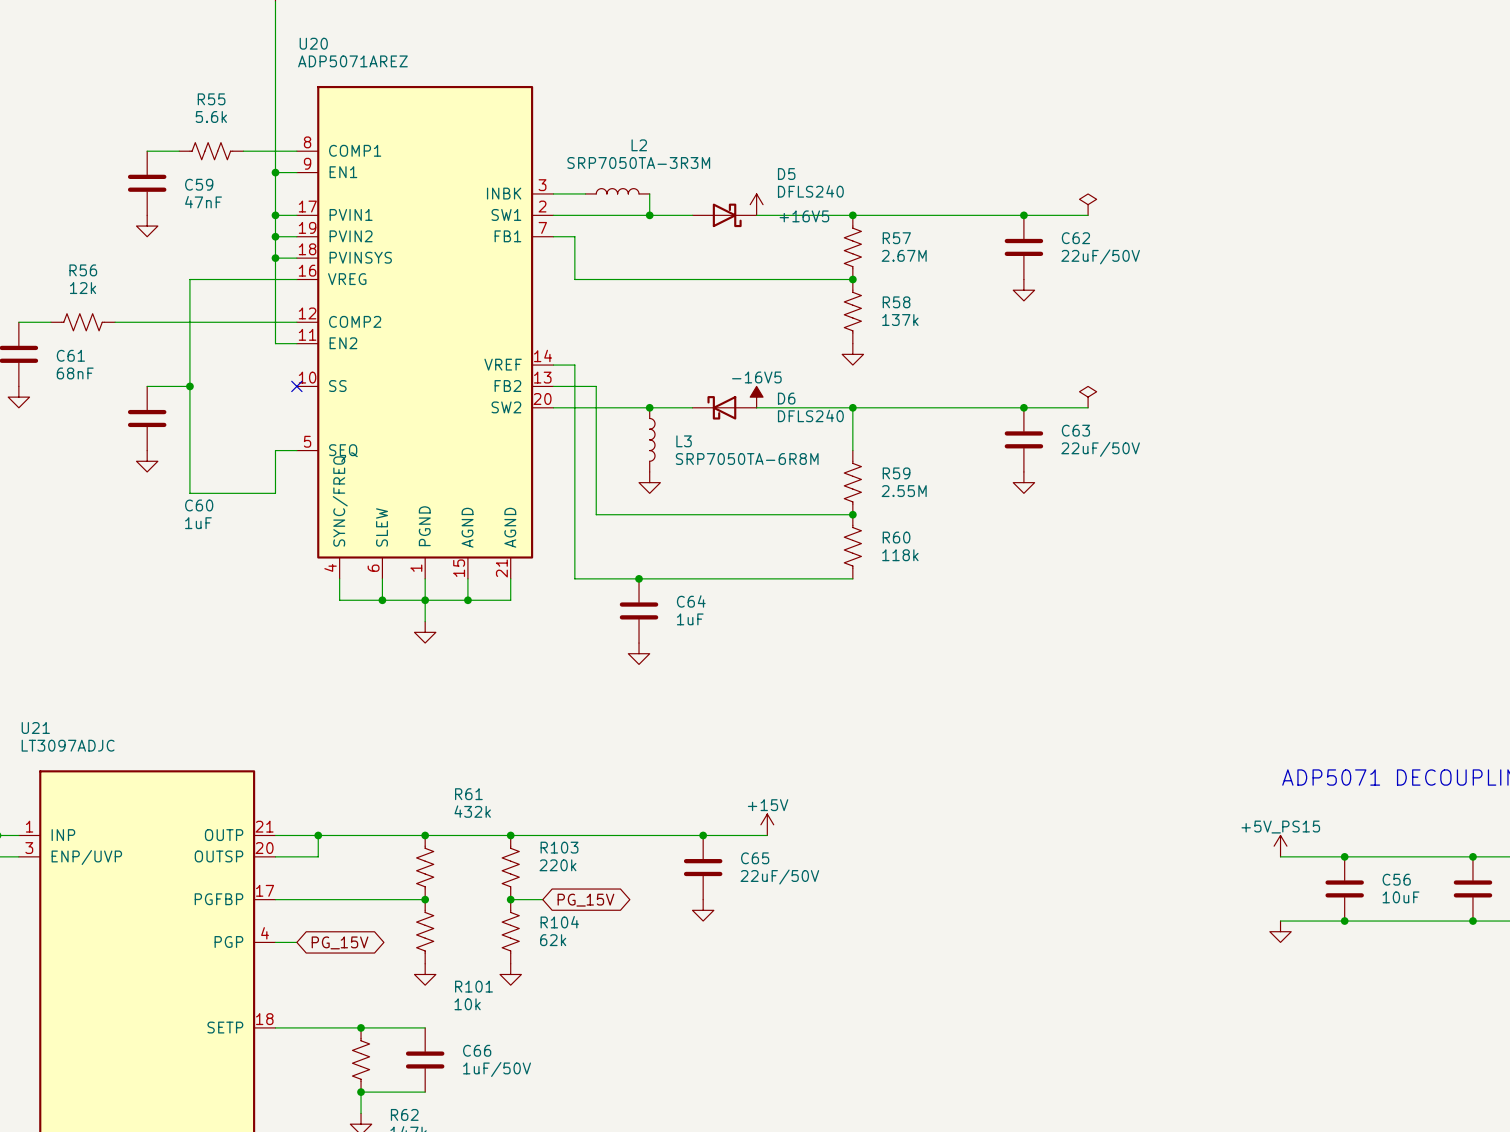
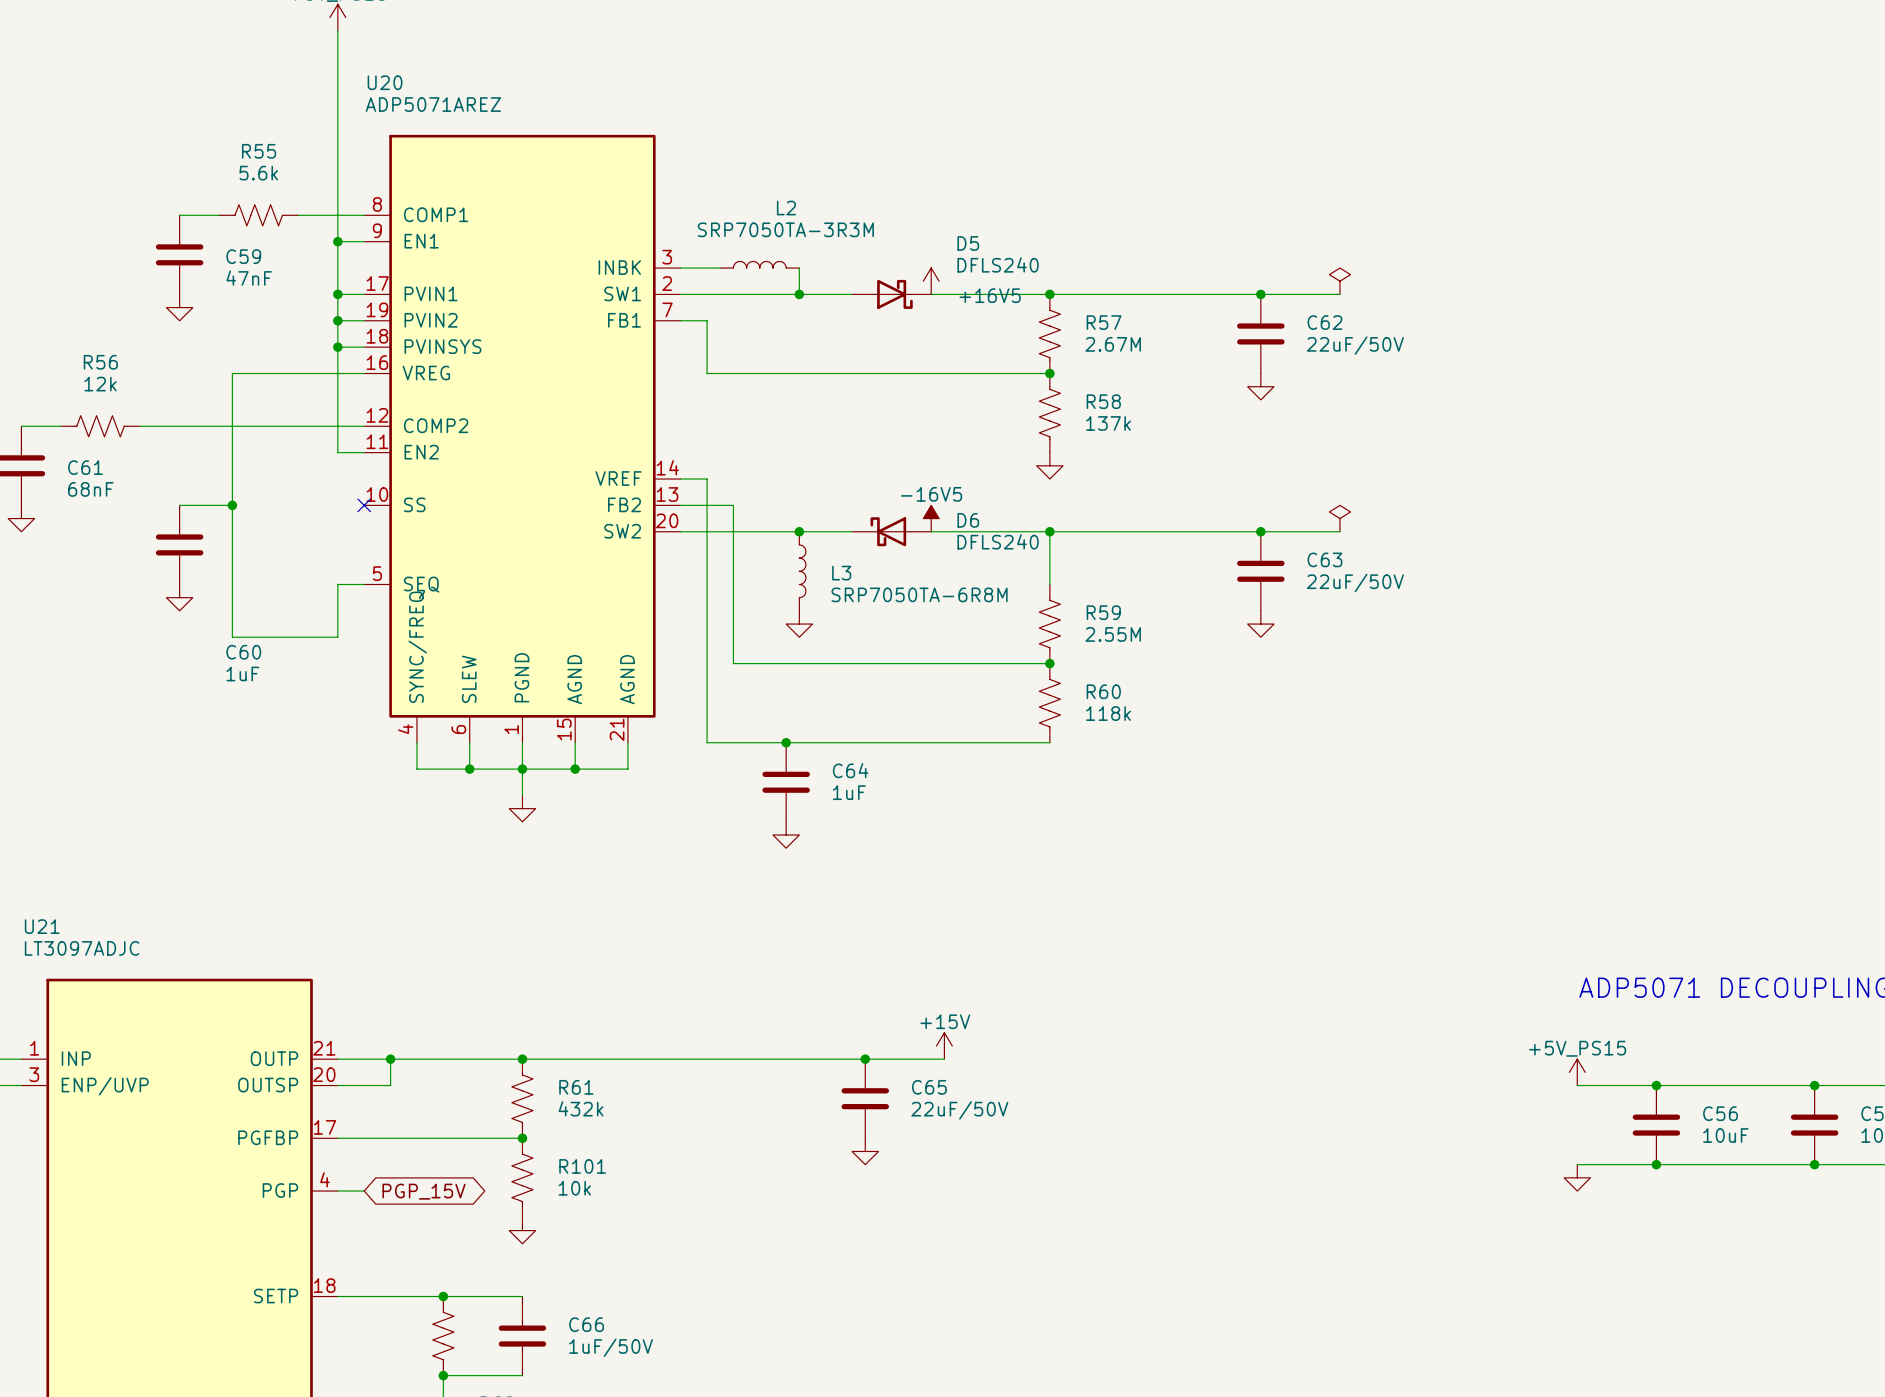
R61 name position: R61 (468, 794) -> R61 (576, 1087)
R61 value position: 432k (472, 811) -> 432k (581, 1108)
junction: (510, 835) -> none
R103: 220k (510, 867) -> none
wire: (510, 899) (542, 899) -> none
junction: (510, 899) -> none
global label: PG_15V (585, 900) -> none
R104: 62k (510, 931) -> none
global label: PG_15V (340, 942) -> PGP_15V (424, 1191)
power symbol: (510, 974) -> none
R101 name position: R101 (473, 986) -> R101 (582, 1166)
R101 value position: 10k (467, 1004) -> 10k (574, 1188)

